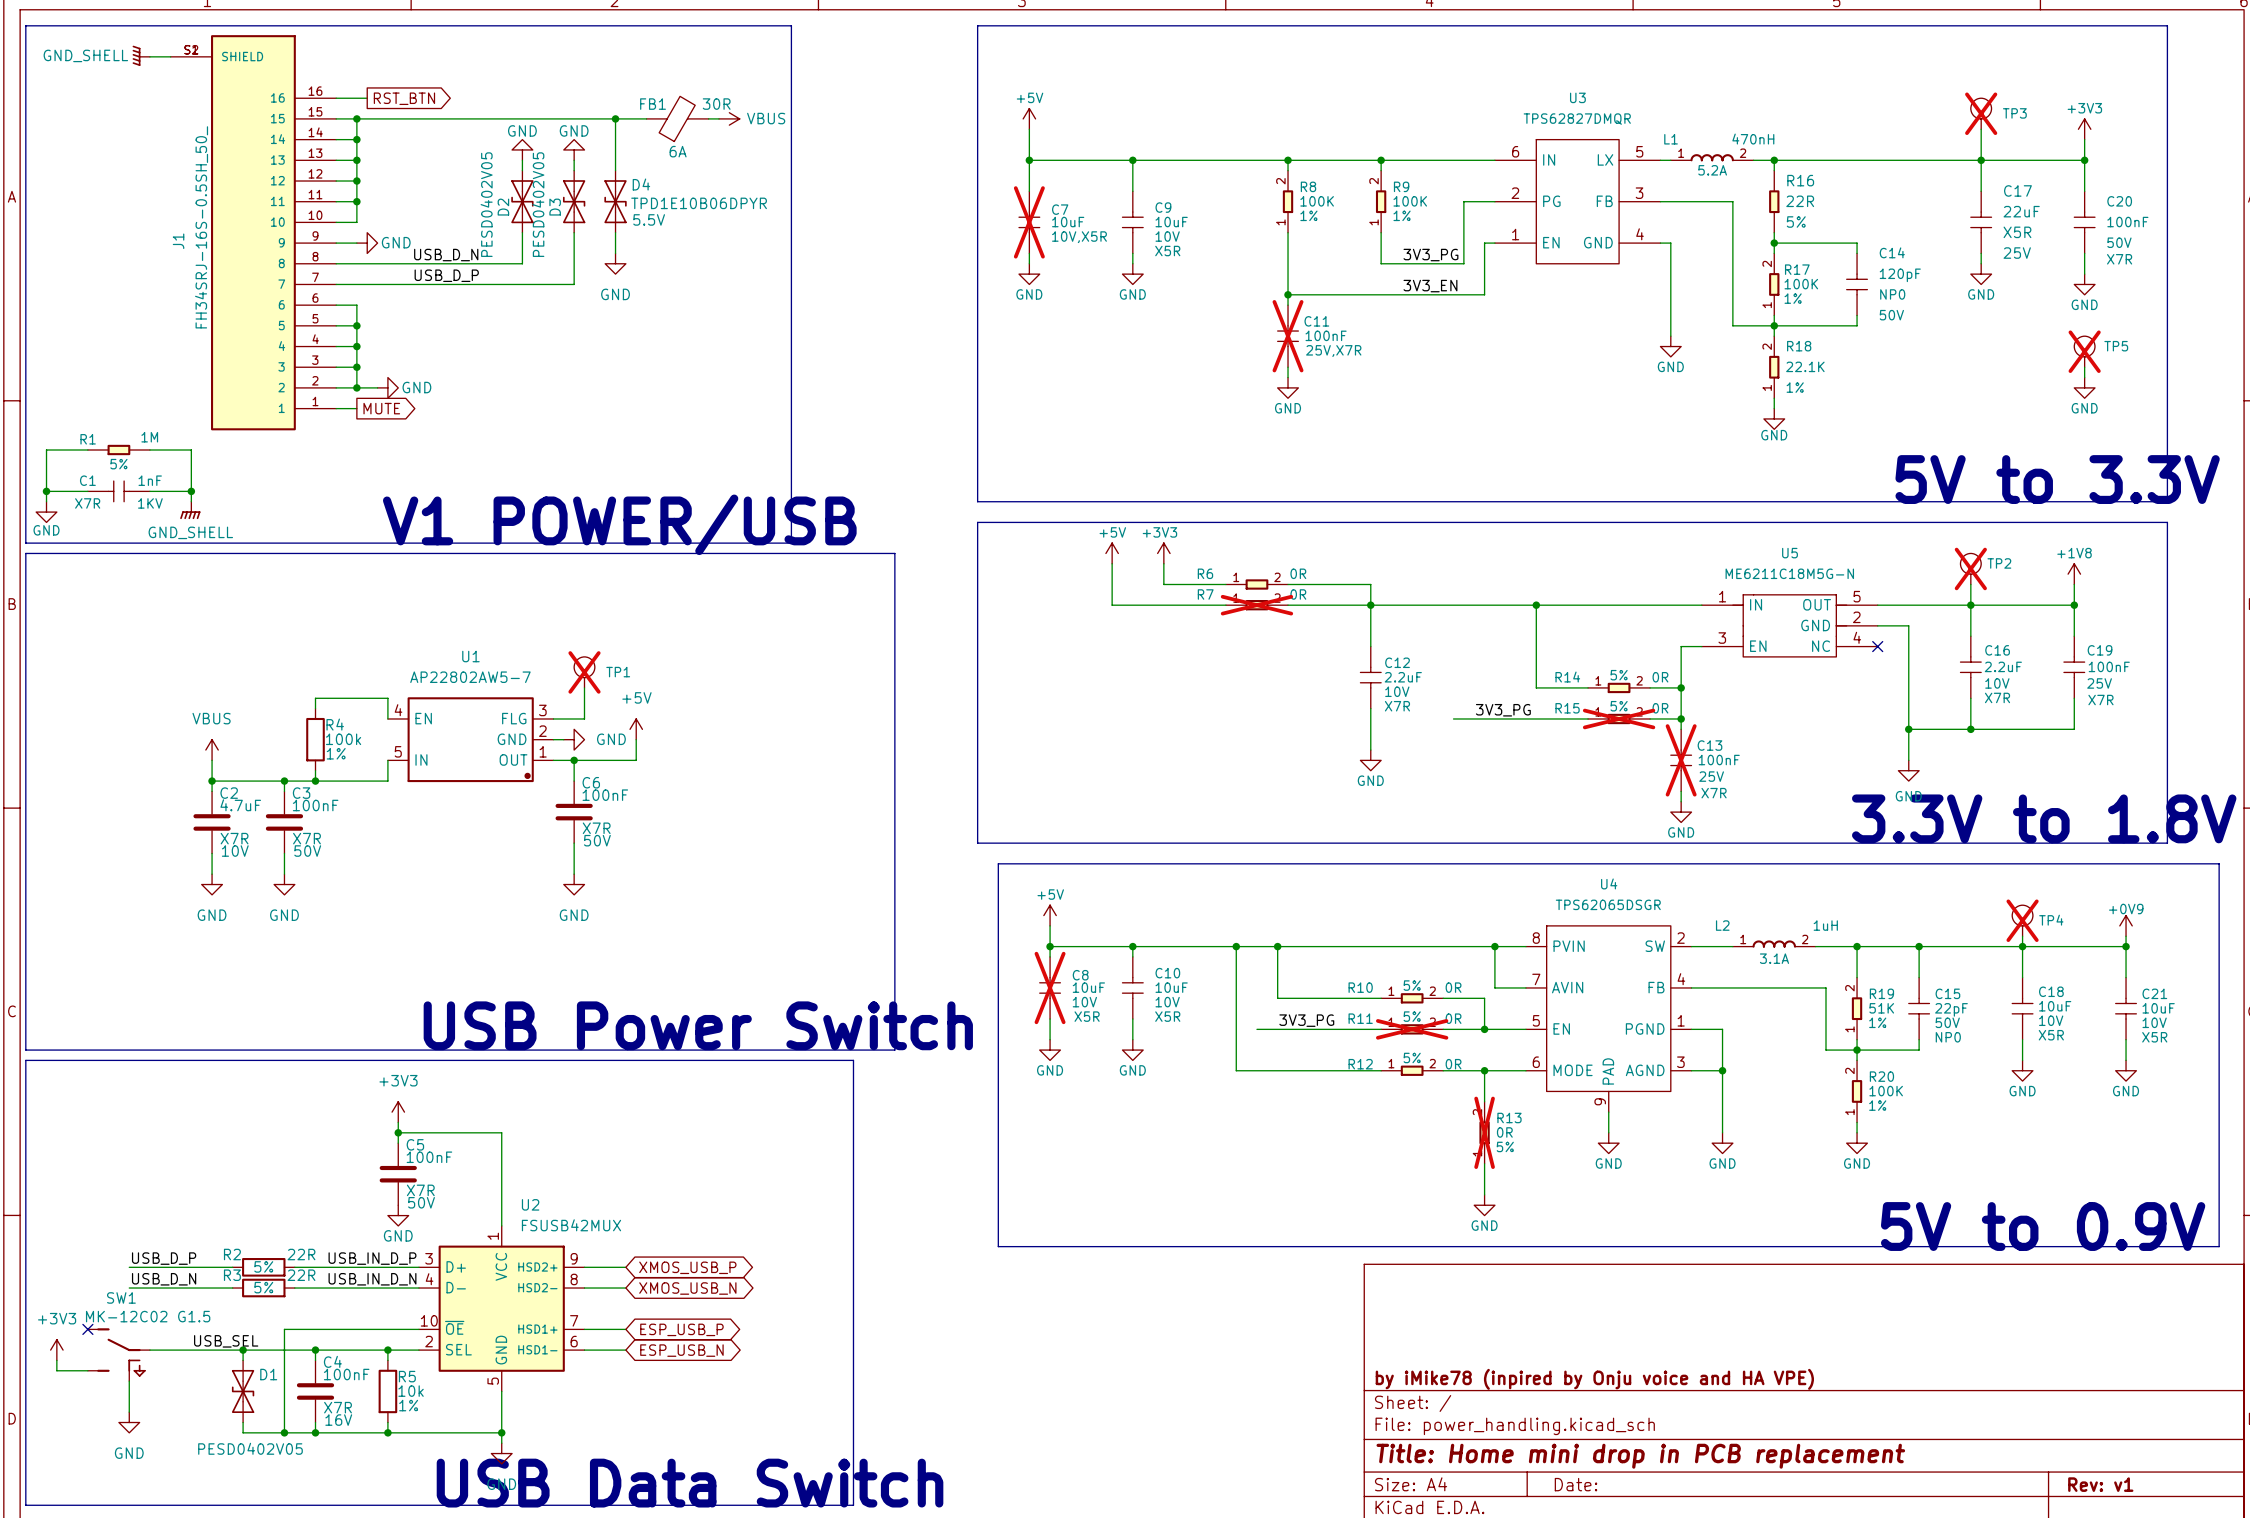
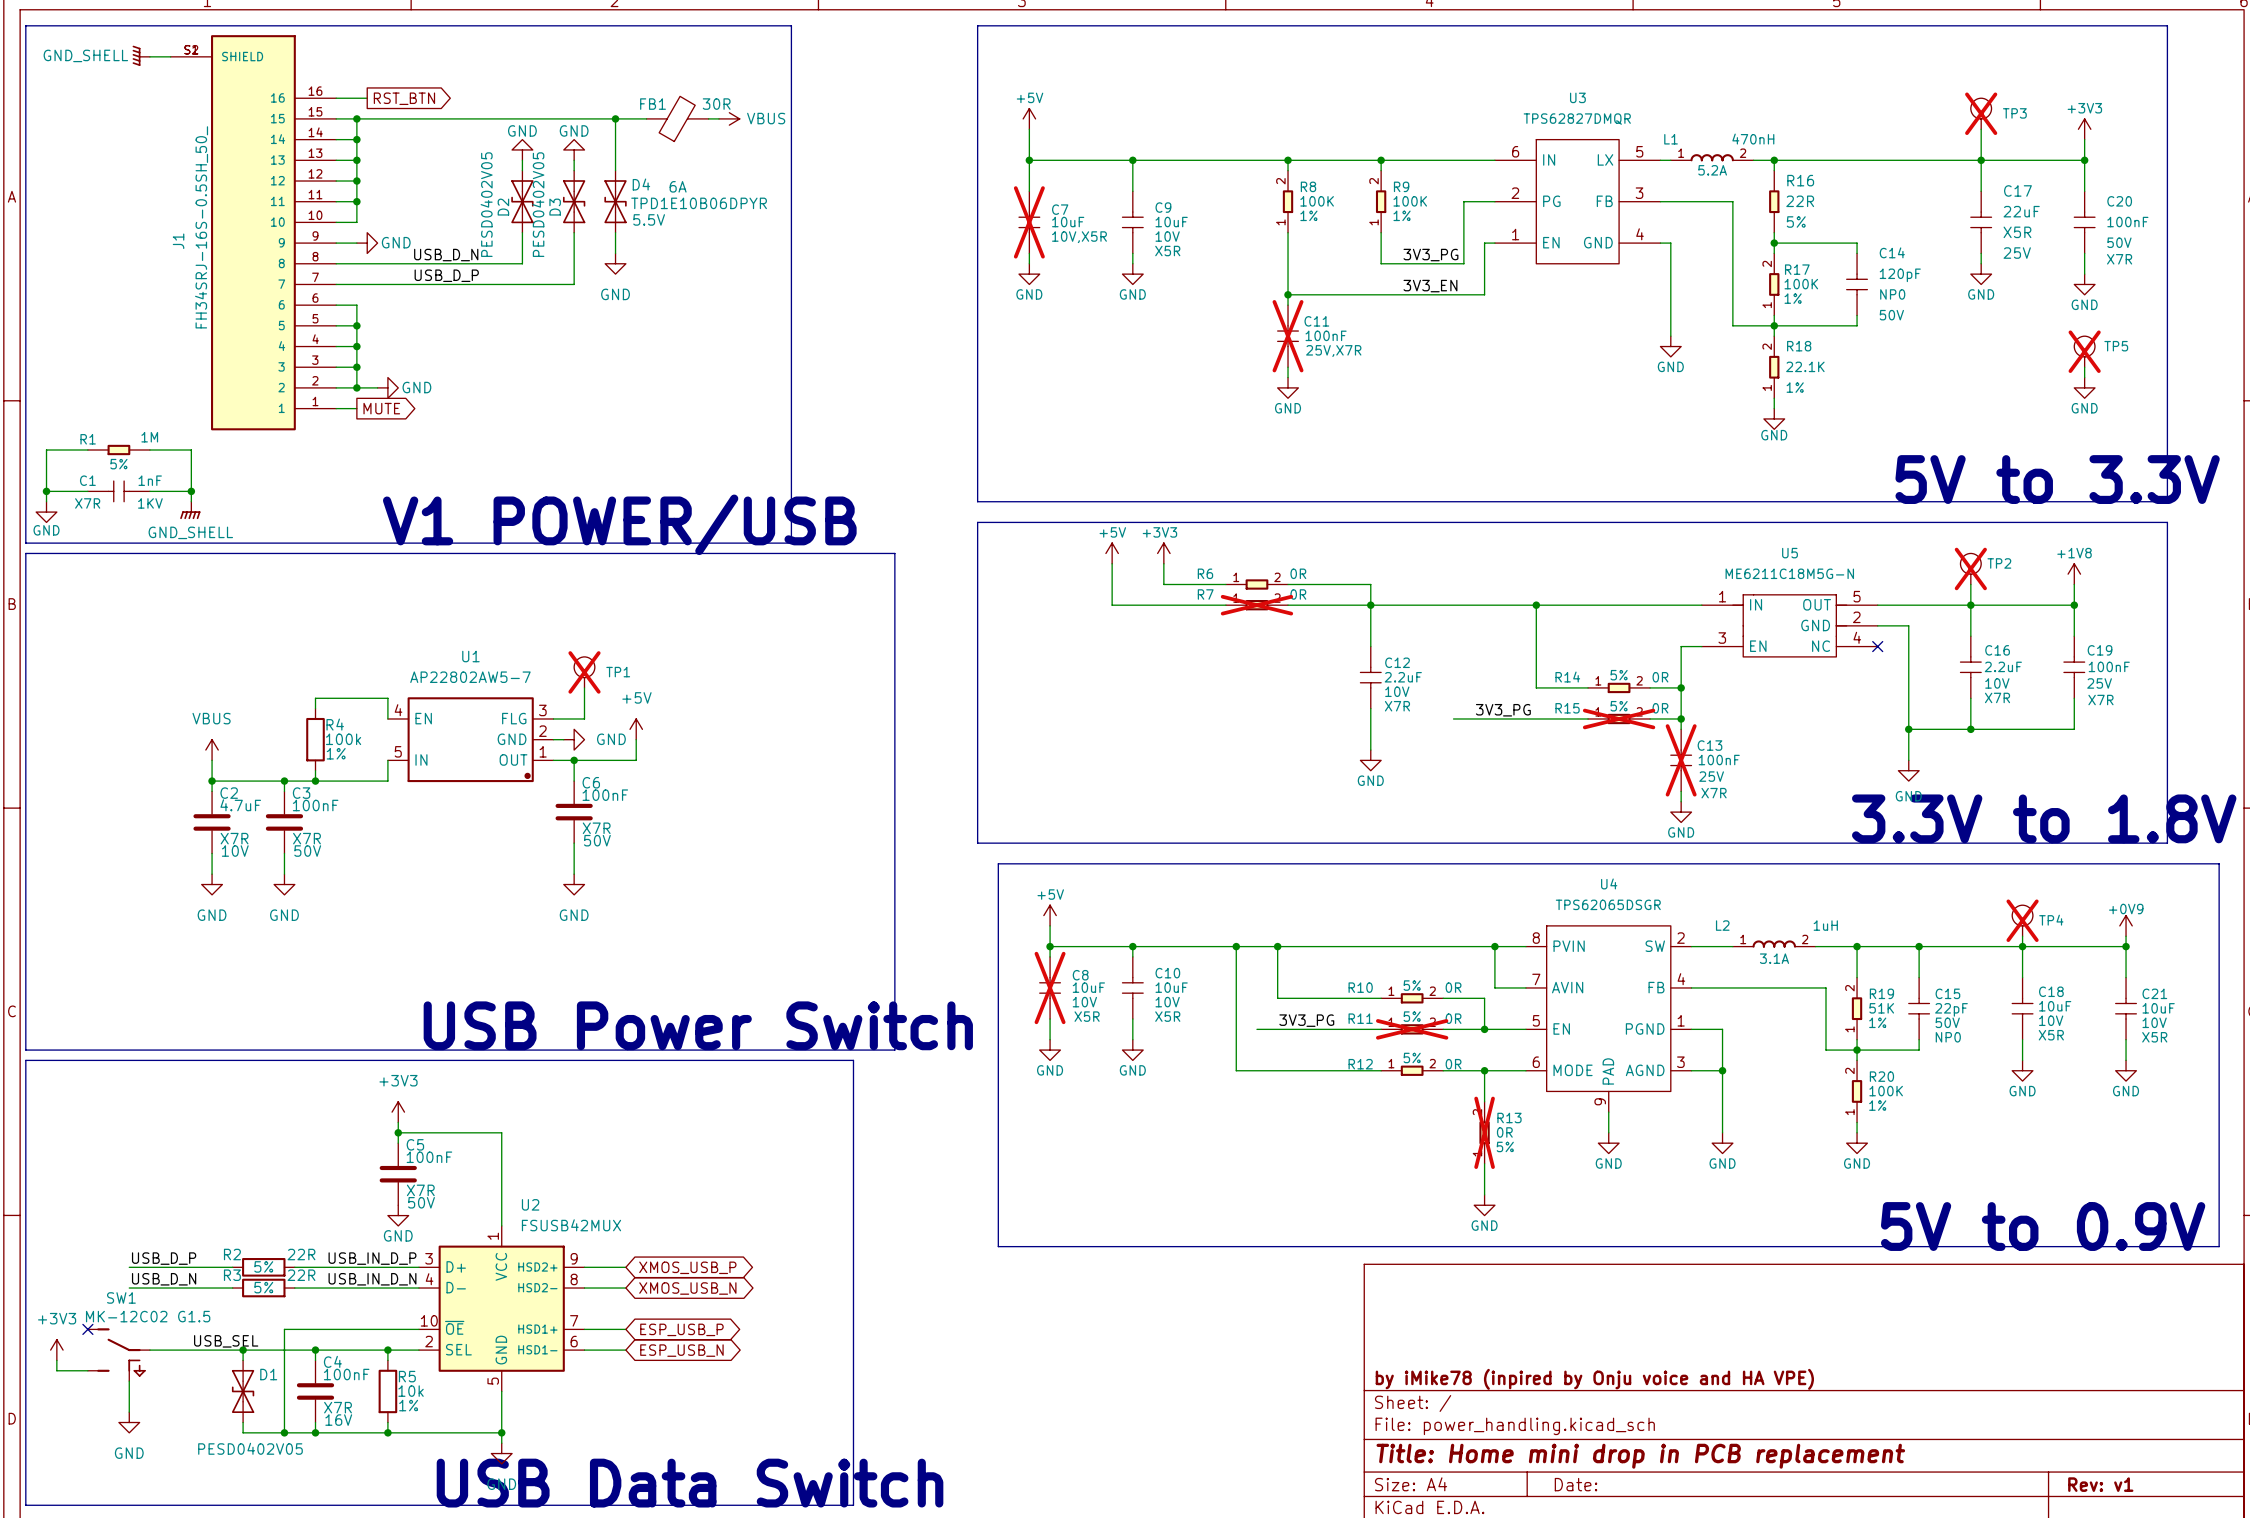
FB1 text position: 6A (678, 151) -> 6A (678, 186)

